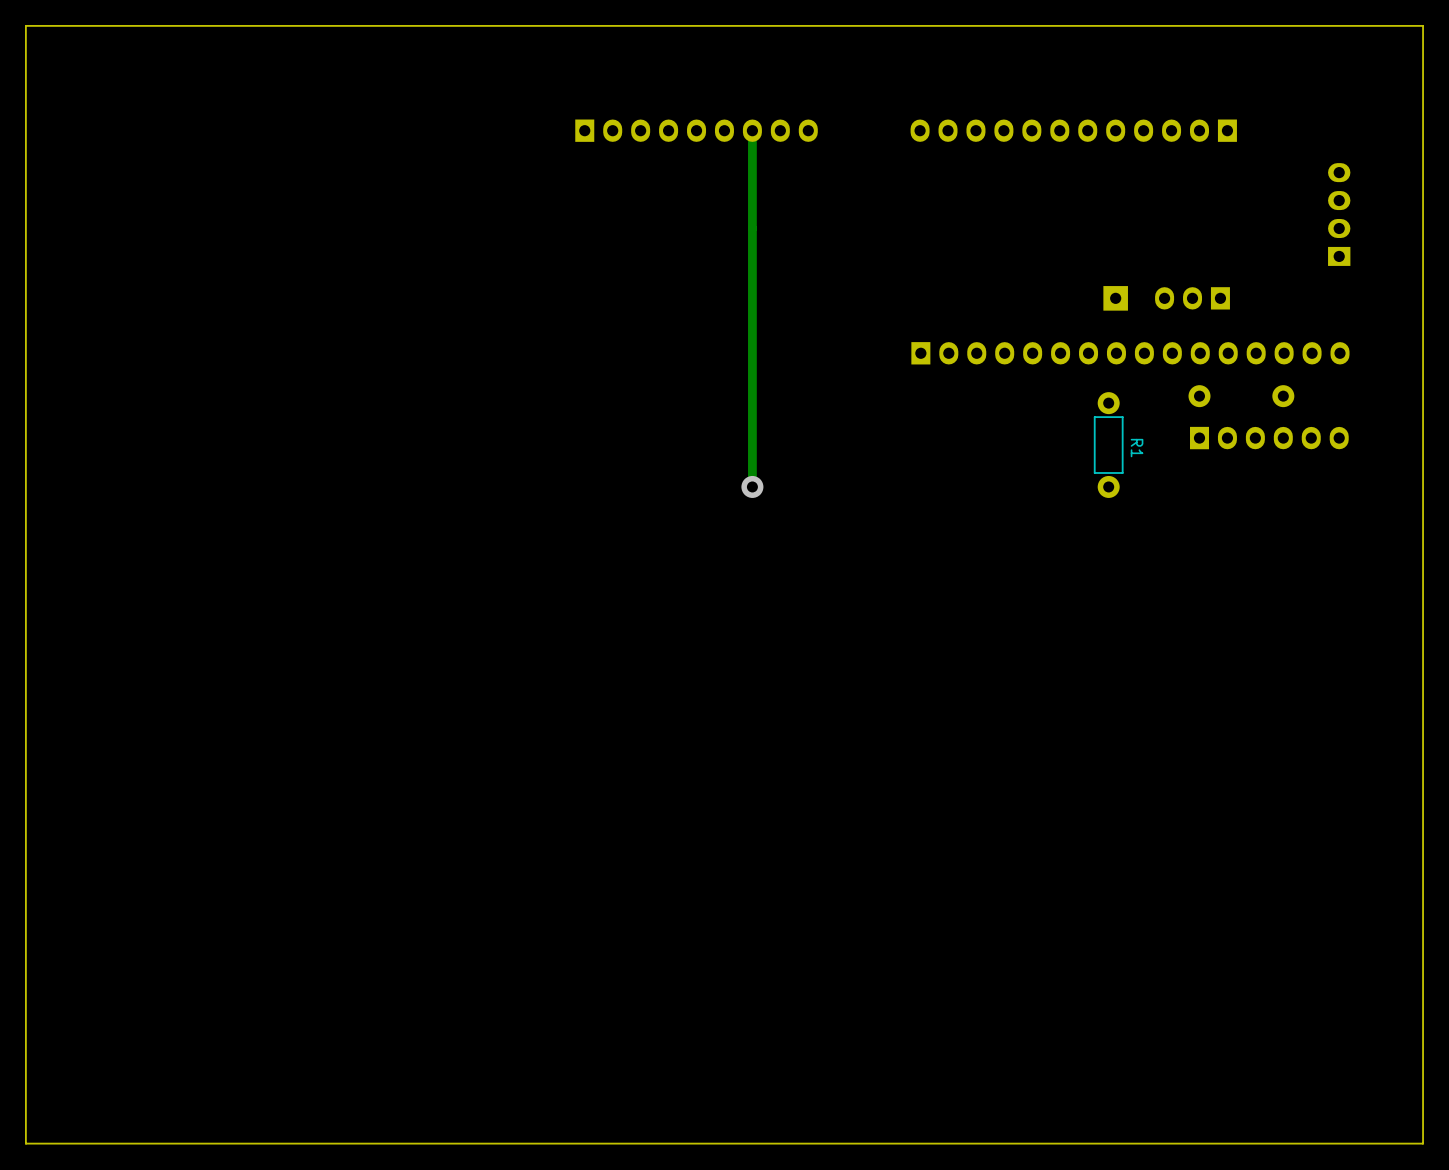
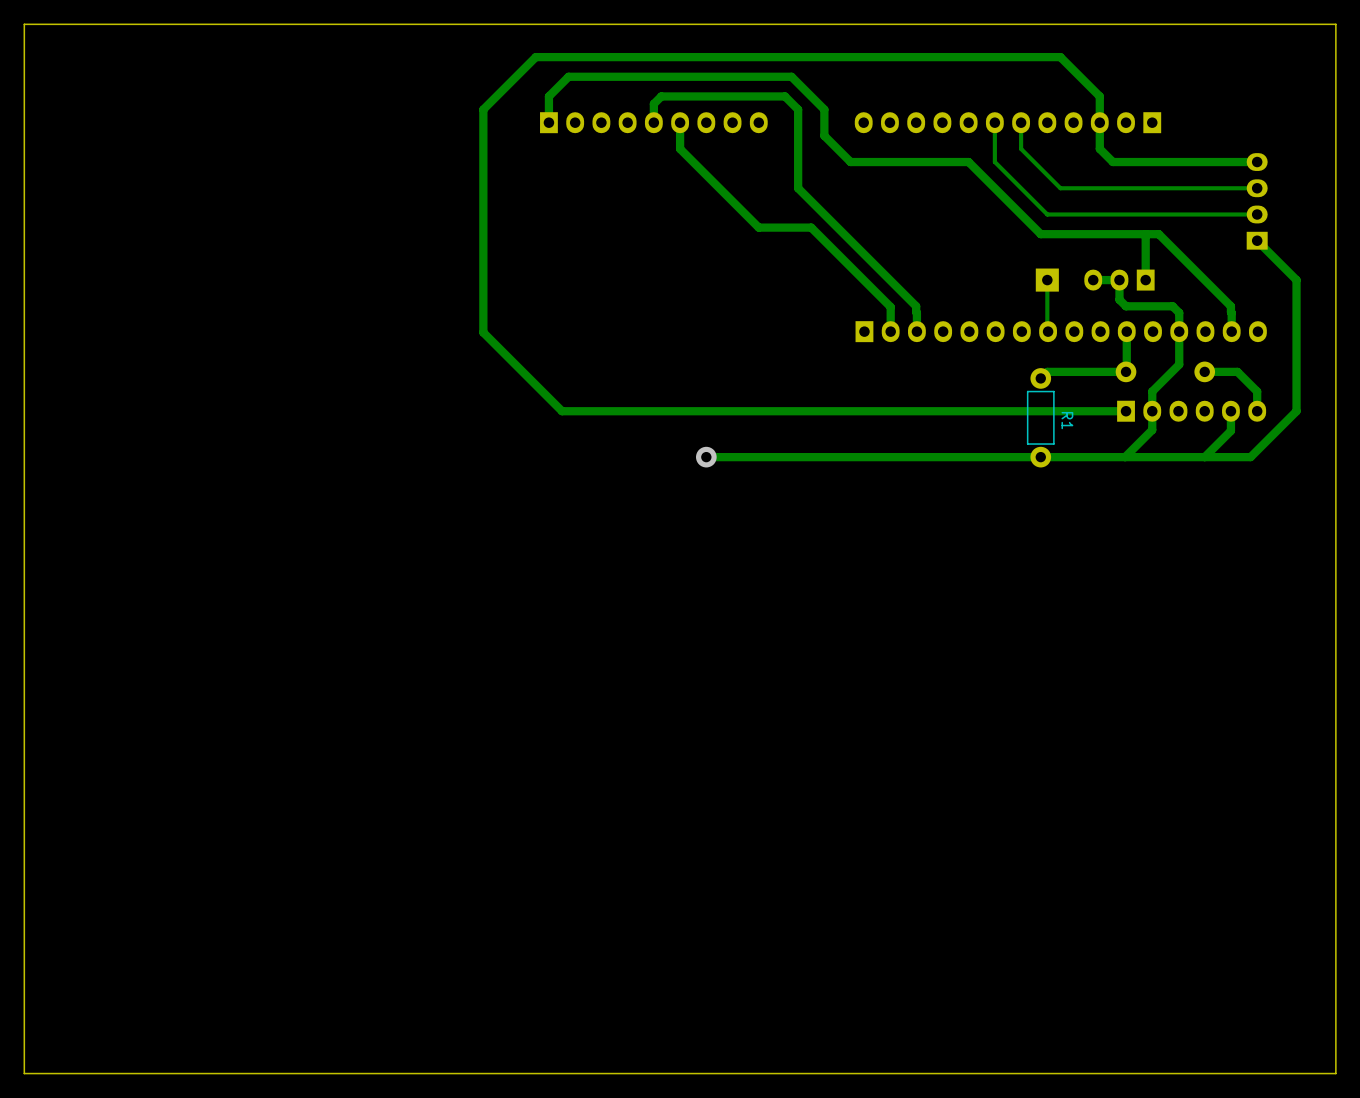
track: none -> (548, 122) (548, 96) (568, 76) (791, 76) (824, 109) (824, 135) (850, 162) (968, 162) (1040, 234) (1158, 234) (1230, 306) (1231, 331)
track: none -> (653, 122) (653, 103) (661, 96) (785, 96) (798, 109) (798, 188) (916, 306) (916, 331)
track: none -> (680, 122) (680, 148) (758, 227) (811, 227) (890, 307) (890, 331)
track: (752, 130) (752, 486) -> (1257, 240) (1296, 280) (1296, 411) (1250, 457) (706, 457)
track: none -> (994, 122) (994, 162) (1047, 214) (1257, 214)
track: none -> (1021, 122) (1021, 148) (1060, 188) (1257, 188)
track: none -> (1257, 162) (1112, 162) (1099, 148) (1099, 96) (1060, 57) (535, 57) (483, 109) (483, 332) (562, 411) (1126, 411)
track: none -> (1145, 234) (1145, 280)
track: none -> (1047, 280) (1048, 331)
track: none -> (1093, 280) (1119, 280) (1119, 299) (1126, 306) (1172, 306) (1179, 312) (1179, 364) (1152, 391) (1152, 429) (1125, 457)
track: none -> (1126, 331) (1126, 371) (1047, 371) (1040, 378)
track: none -> (1204, 371) (1237, 371) (1257, 391) (1257, 411)
track: none -> (1230, 411) (1230, 430) (1204, 457)

